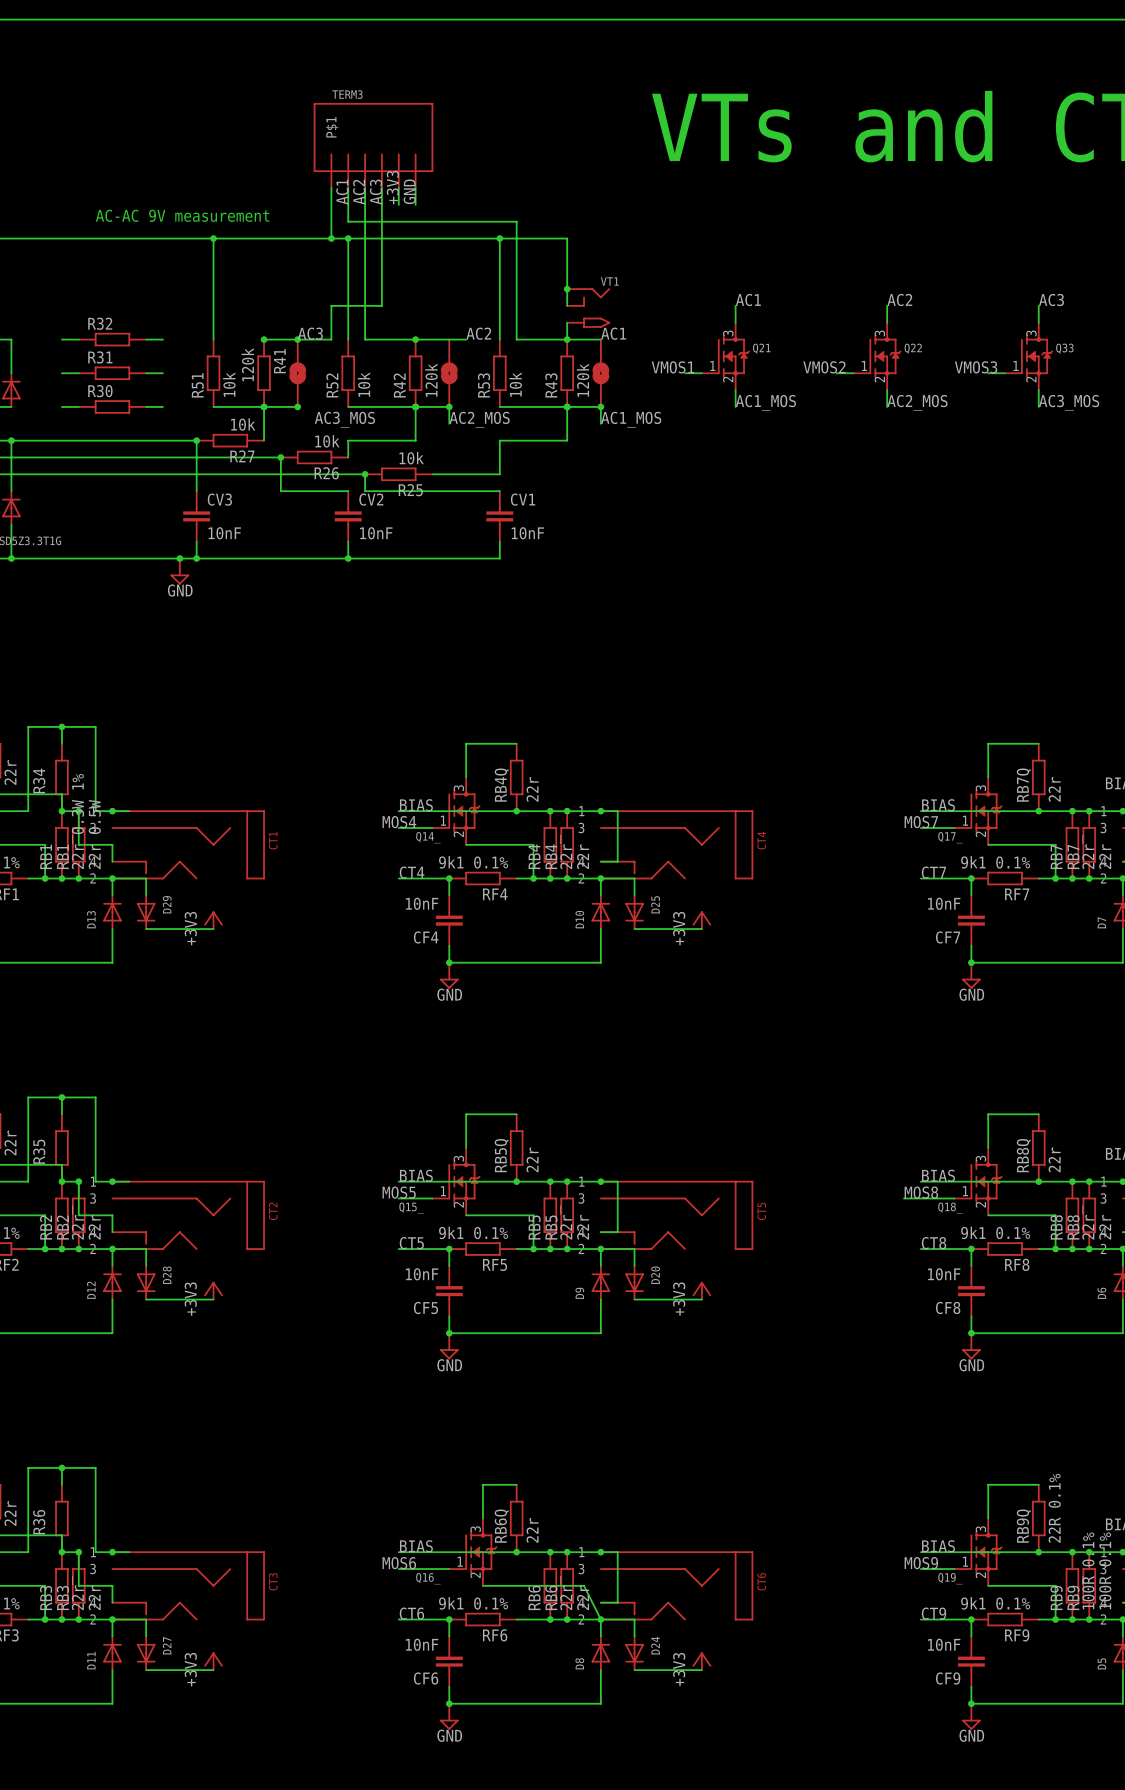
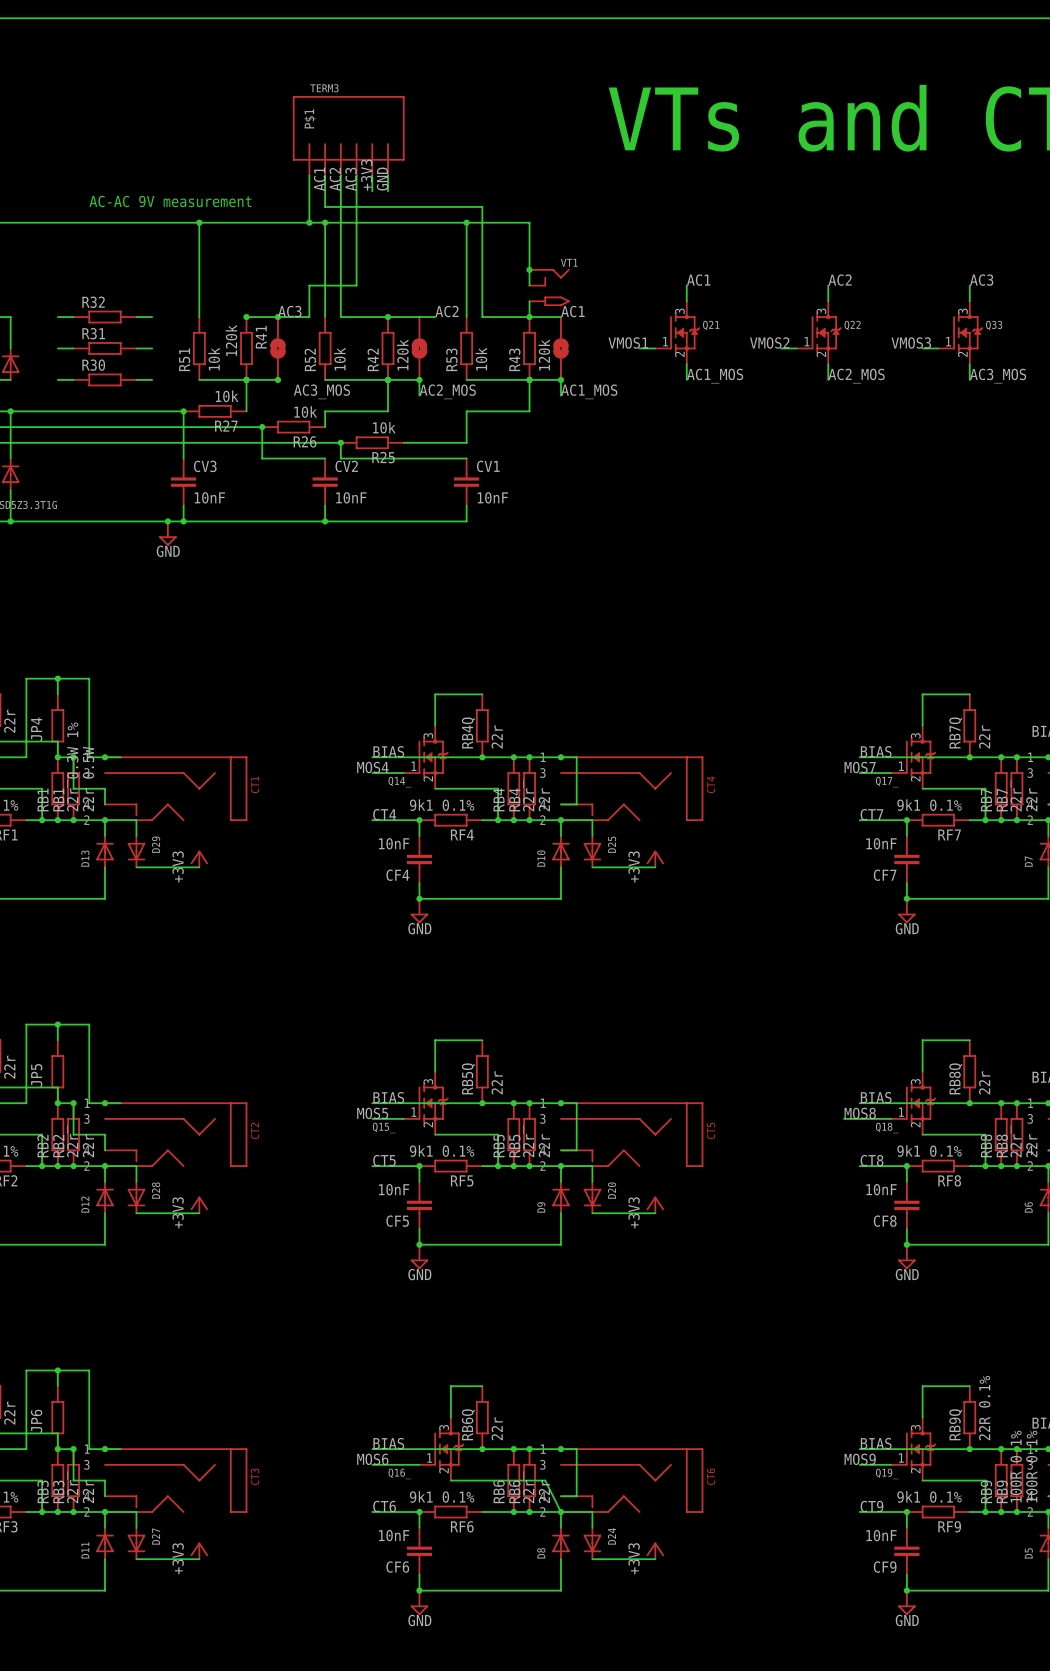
R34 name: R34 (39, 781) -> JP4 (36, 729)
R35 name: R35 (39, 1151) -> JP5 (36, 1075)
R36 name: R36 (39, 1522) -> JP6 (36, 1421)

